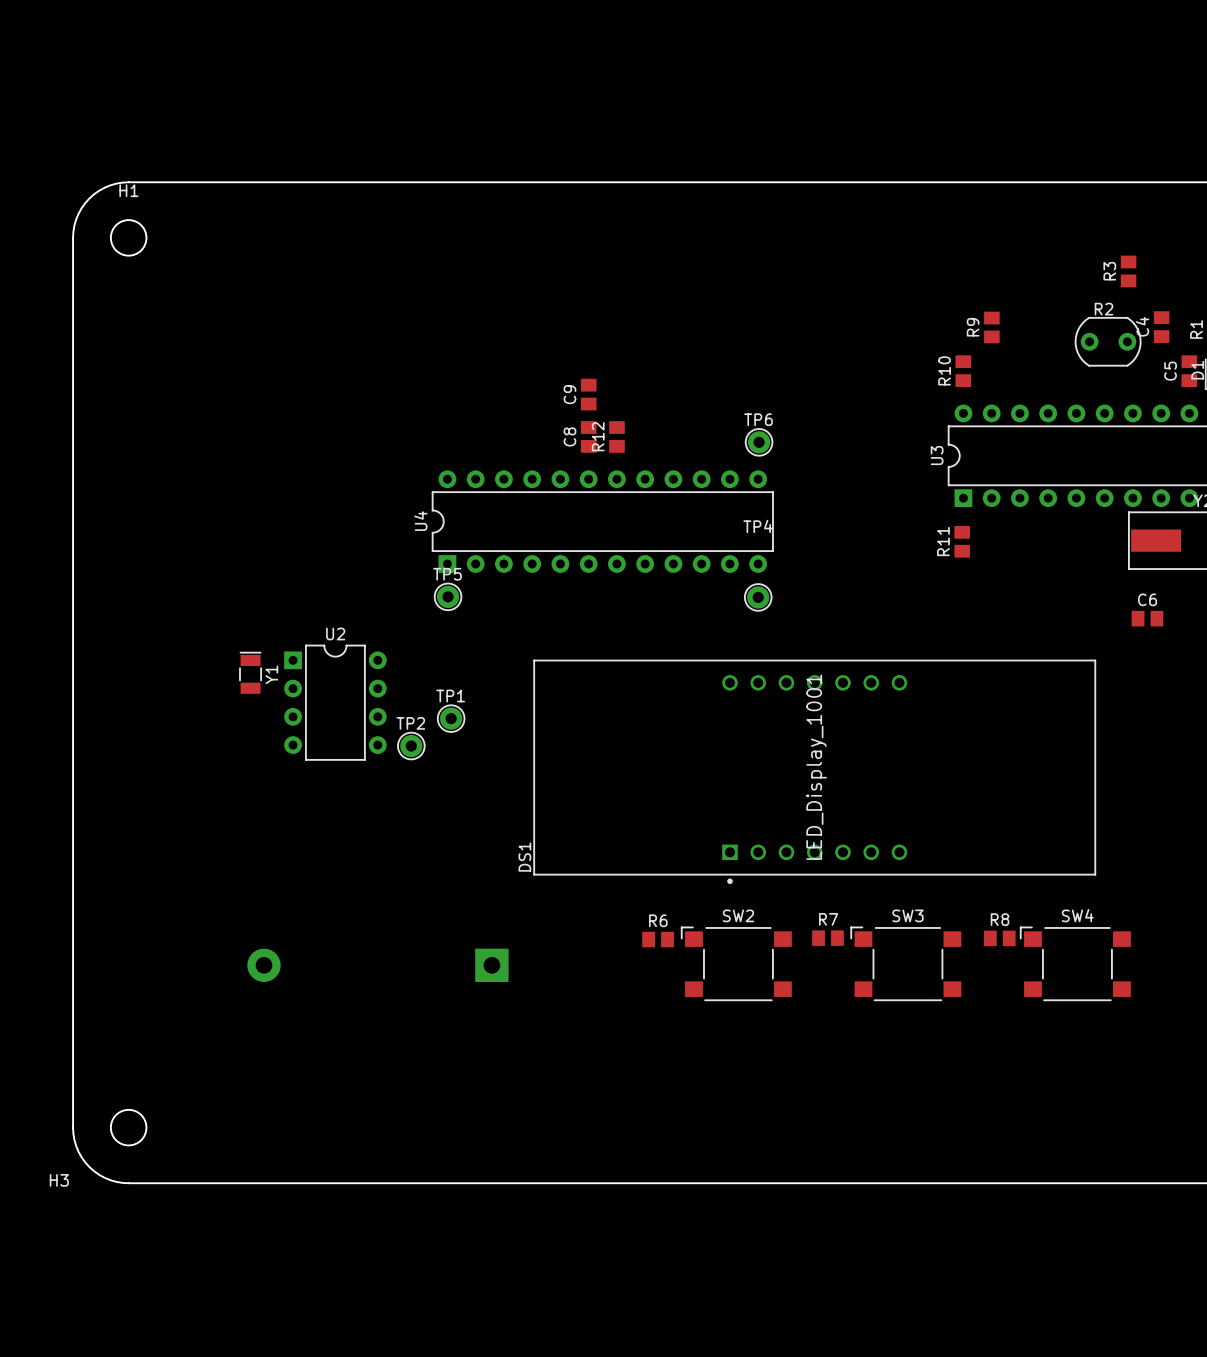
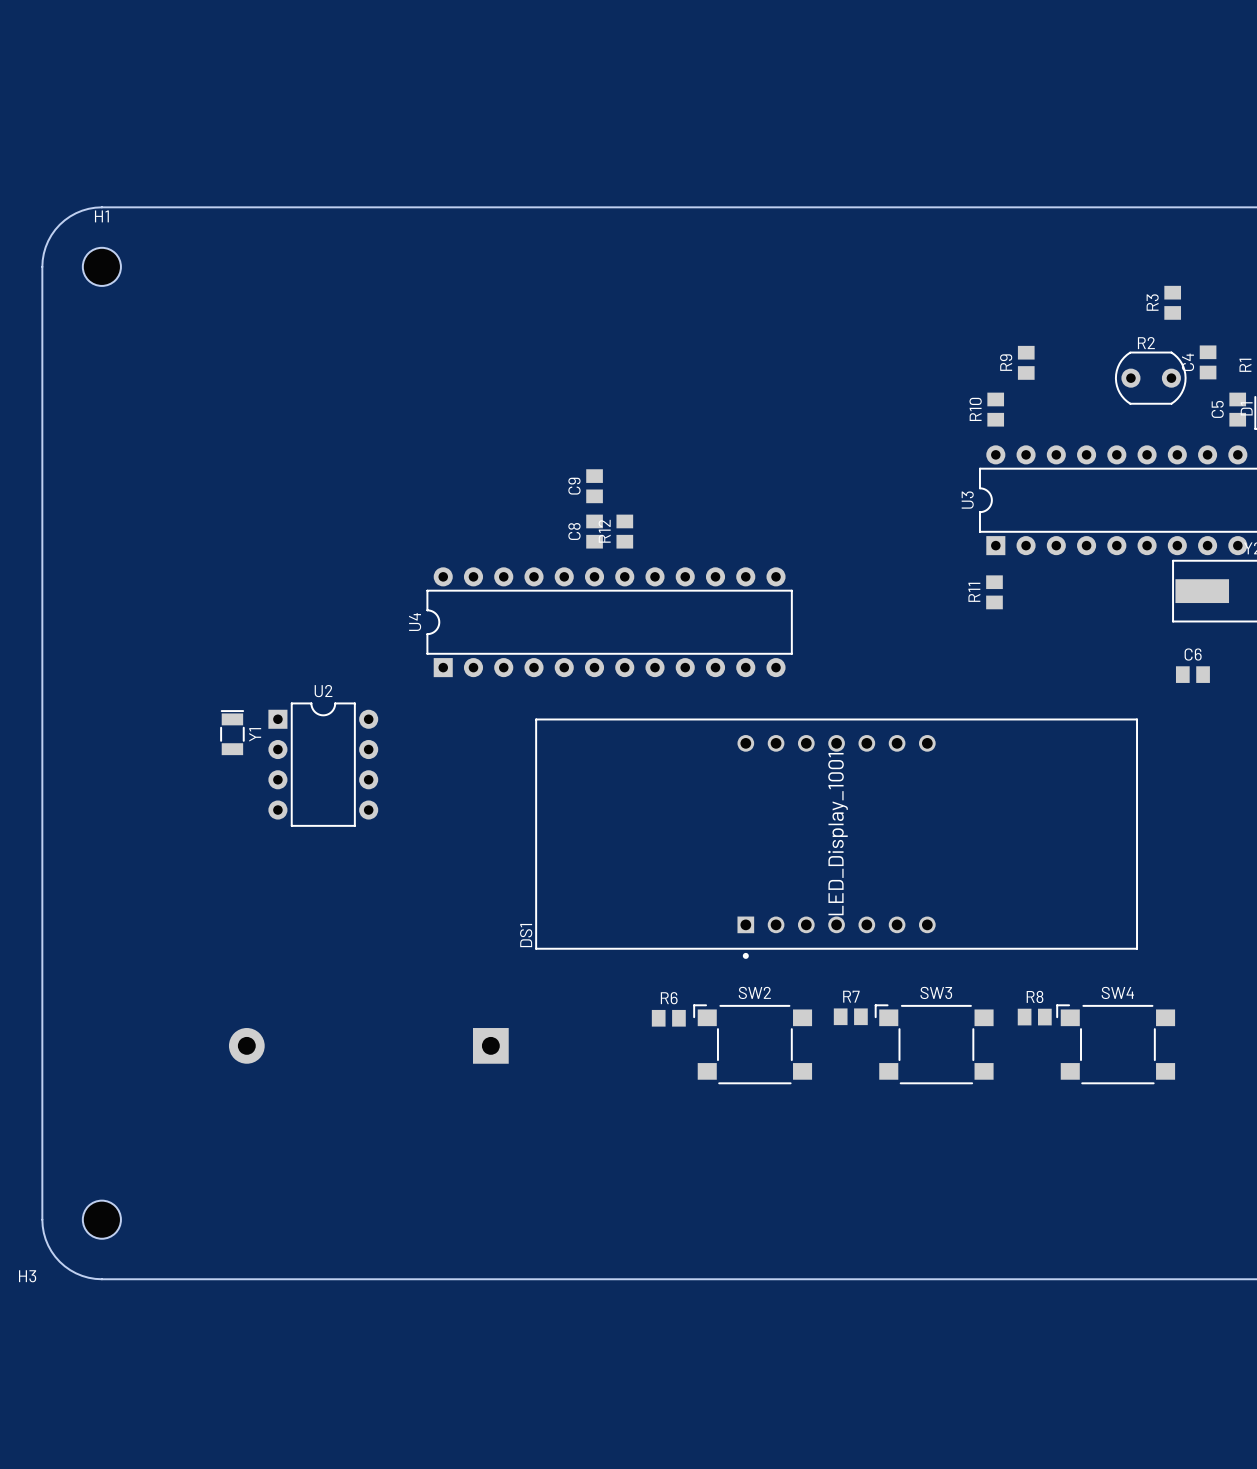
C9 position: (588, 394) -> (594, 486)
C8 position: (588, 436) -> (594, 531)
R12 position: (616, 436) -> (624, 531)
TP6: (759, 442) -> none
U4 position: (602, 521) -> (609, 622)
TP5: (448, 596) -> none
TP4: (758, 597) -> none
TP1: (451, 718) -> none
TP2: (411, 746) -> none

